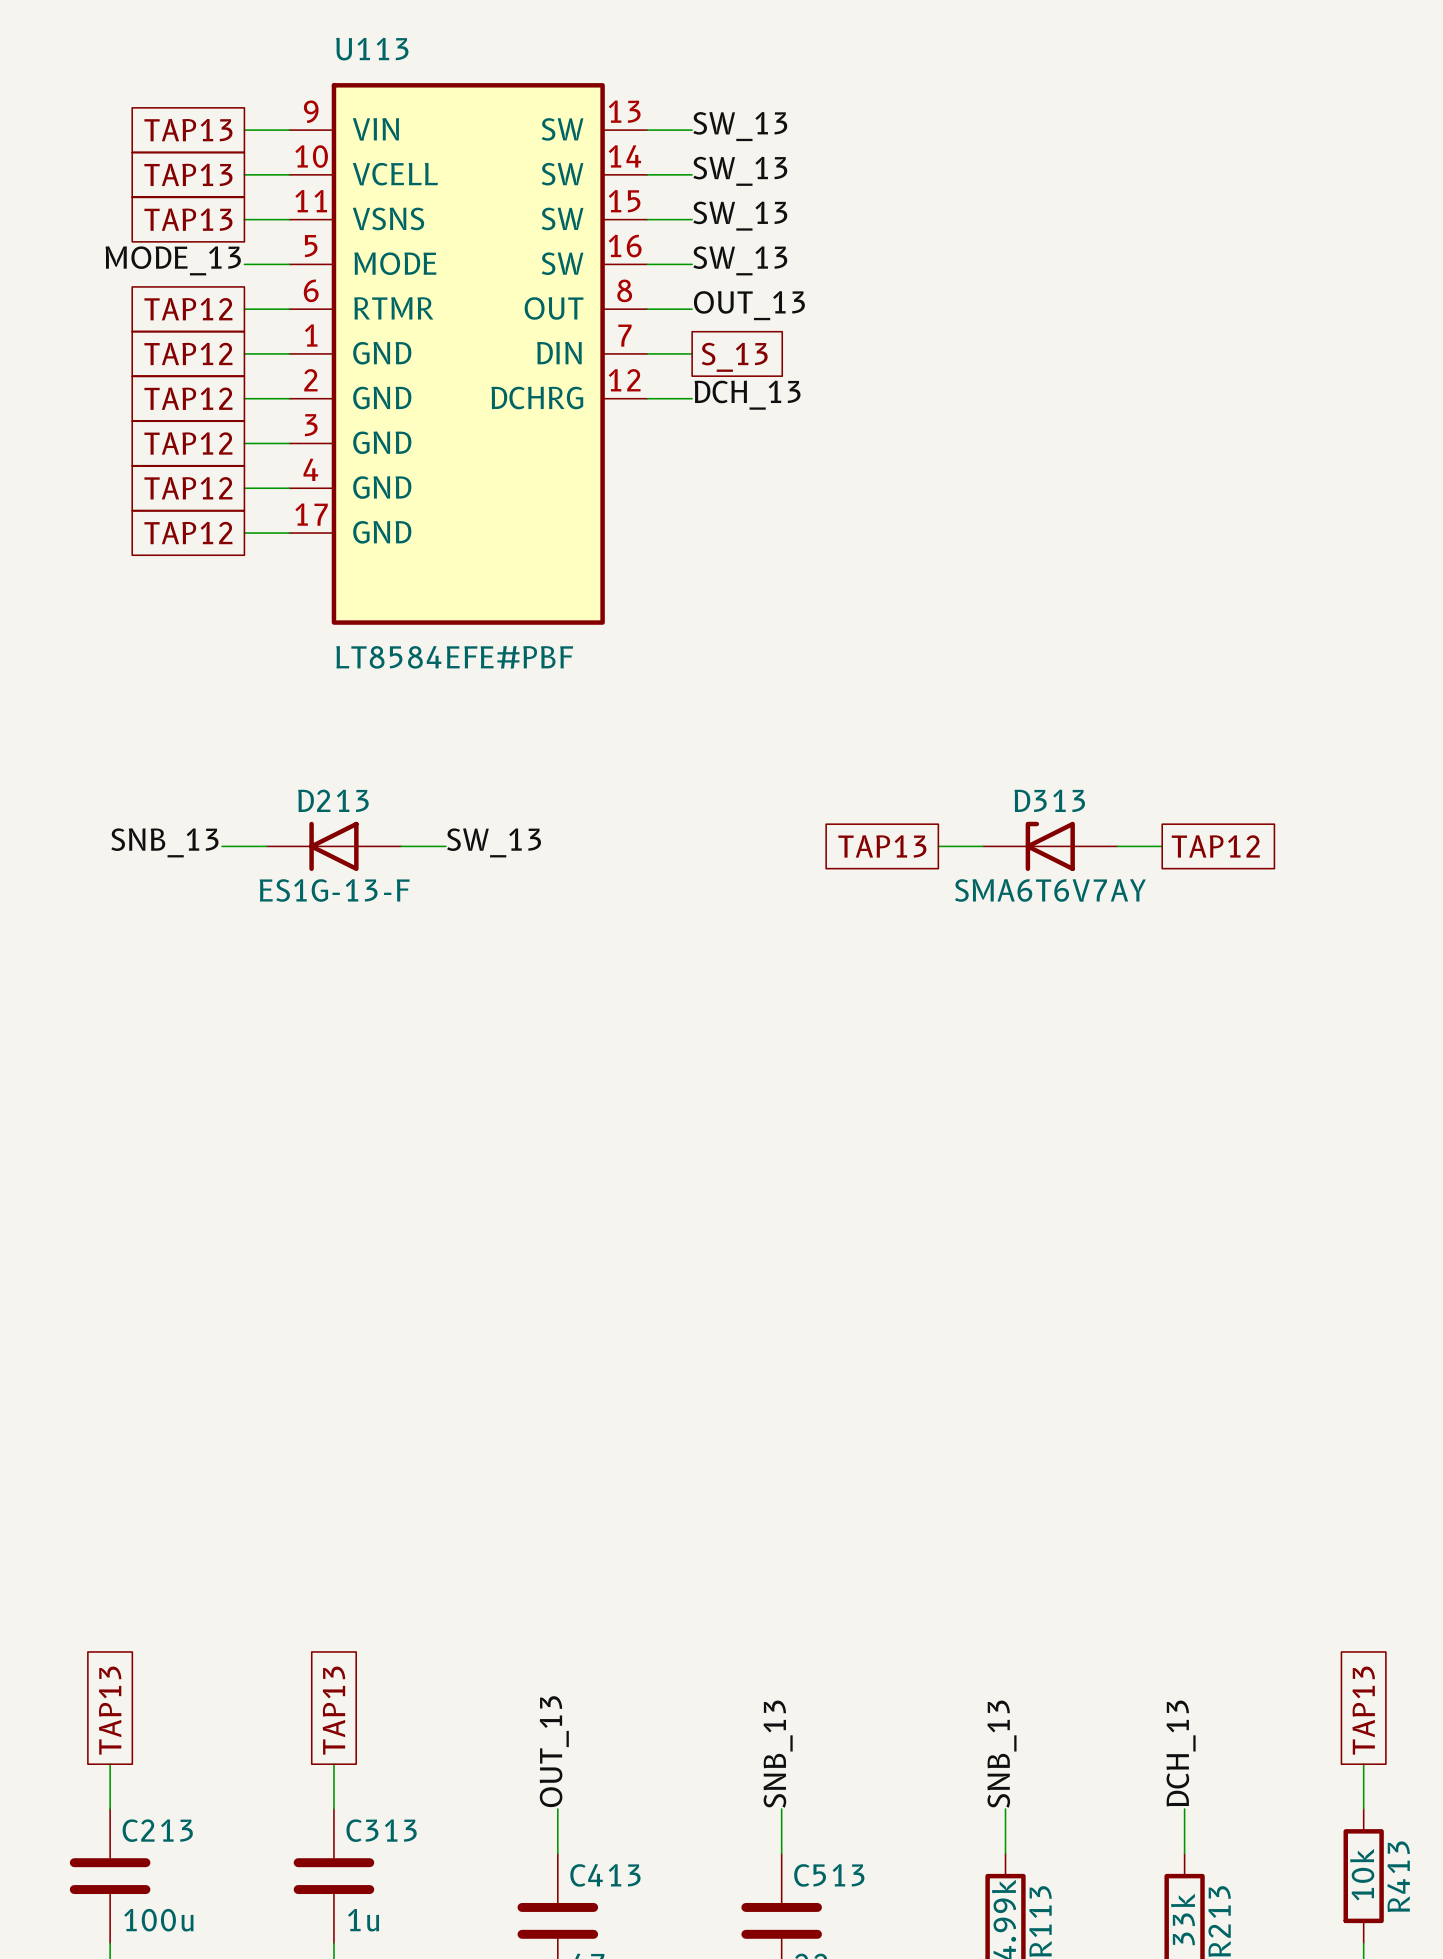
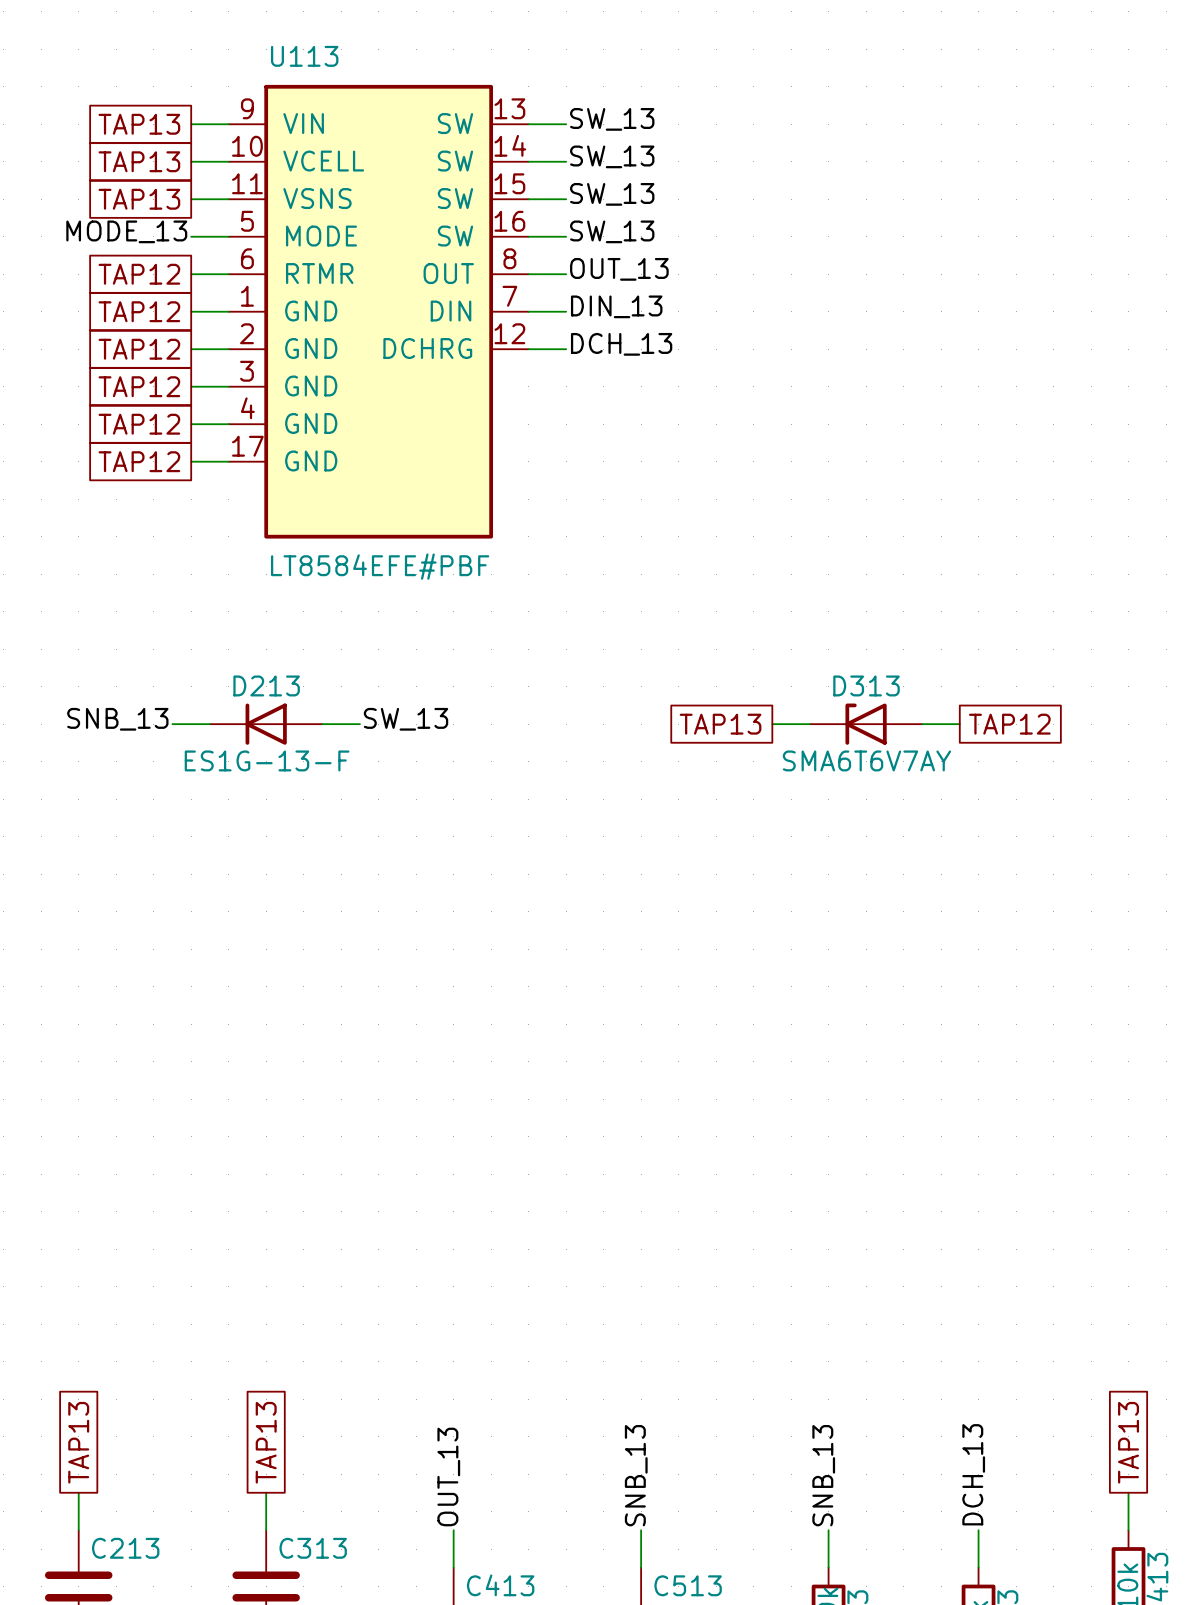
label: none -> DIN_13 (616, 306)
global label: S_13 (734, 357) -> none

